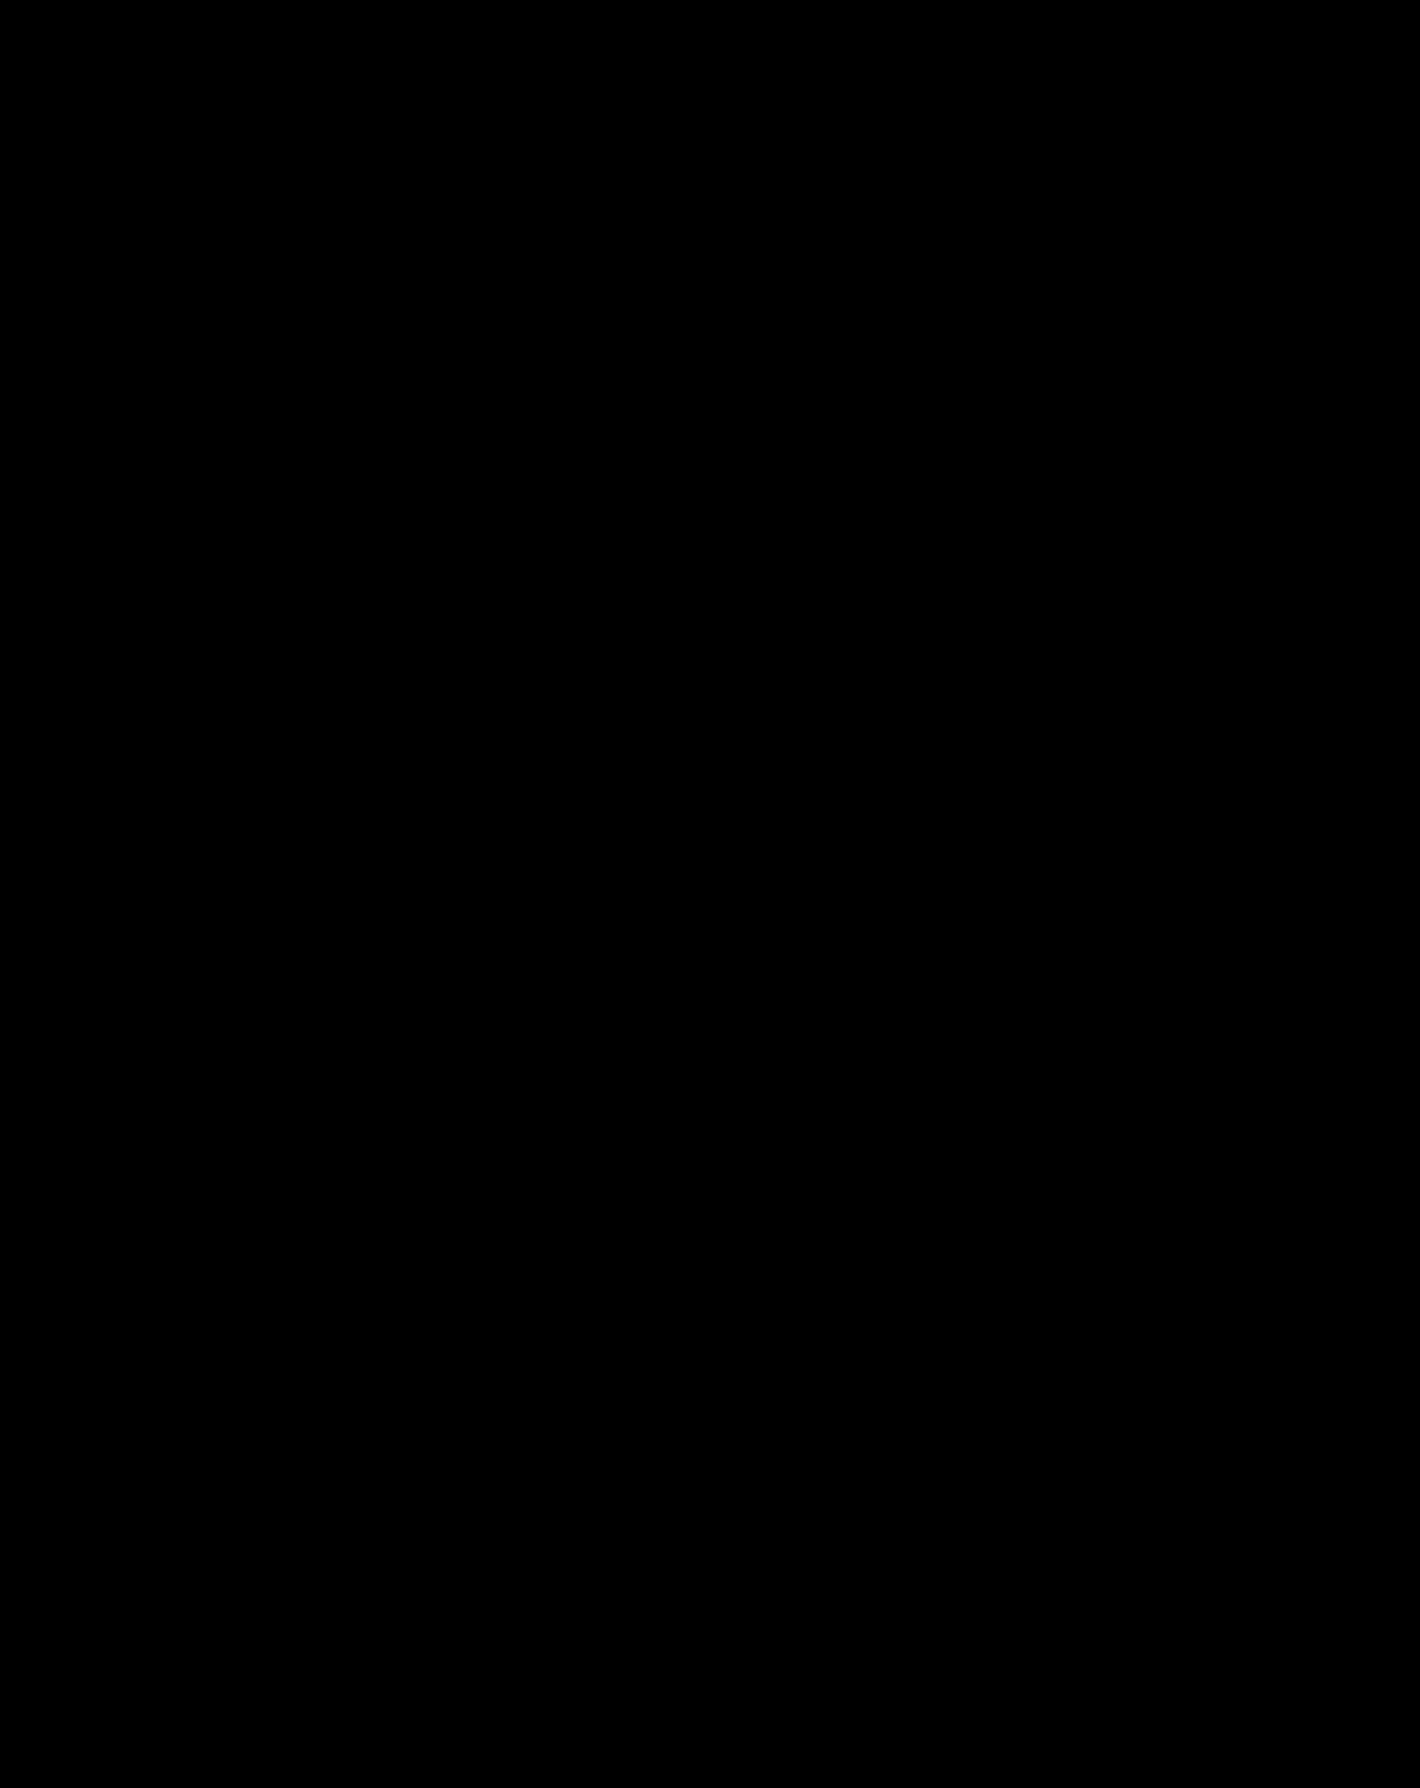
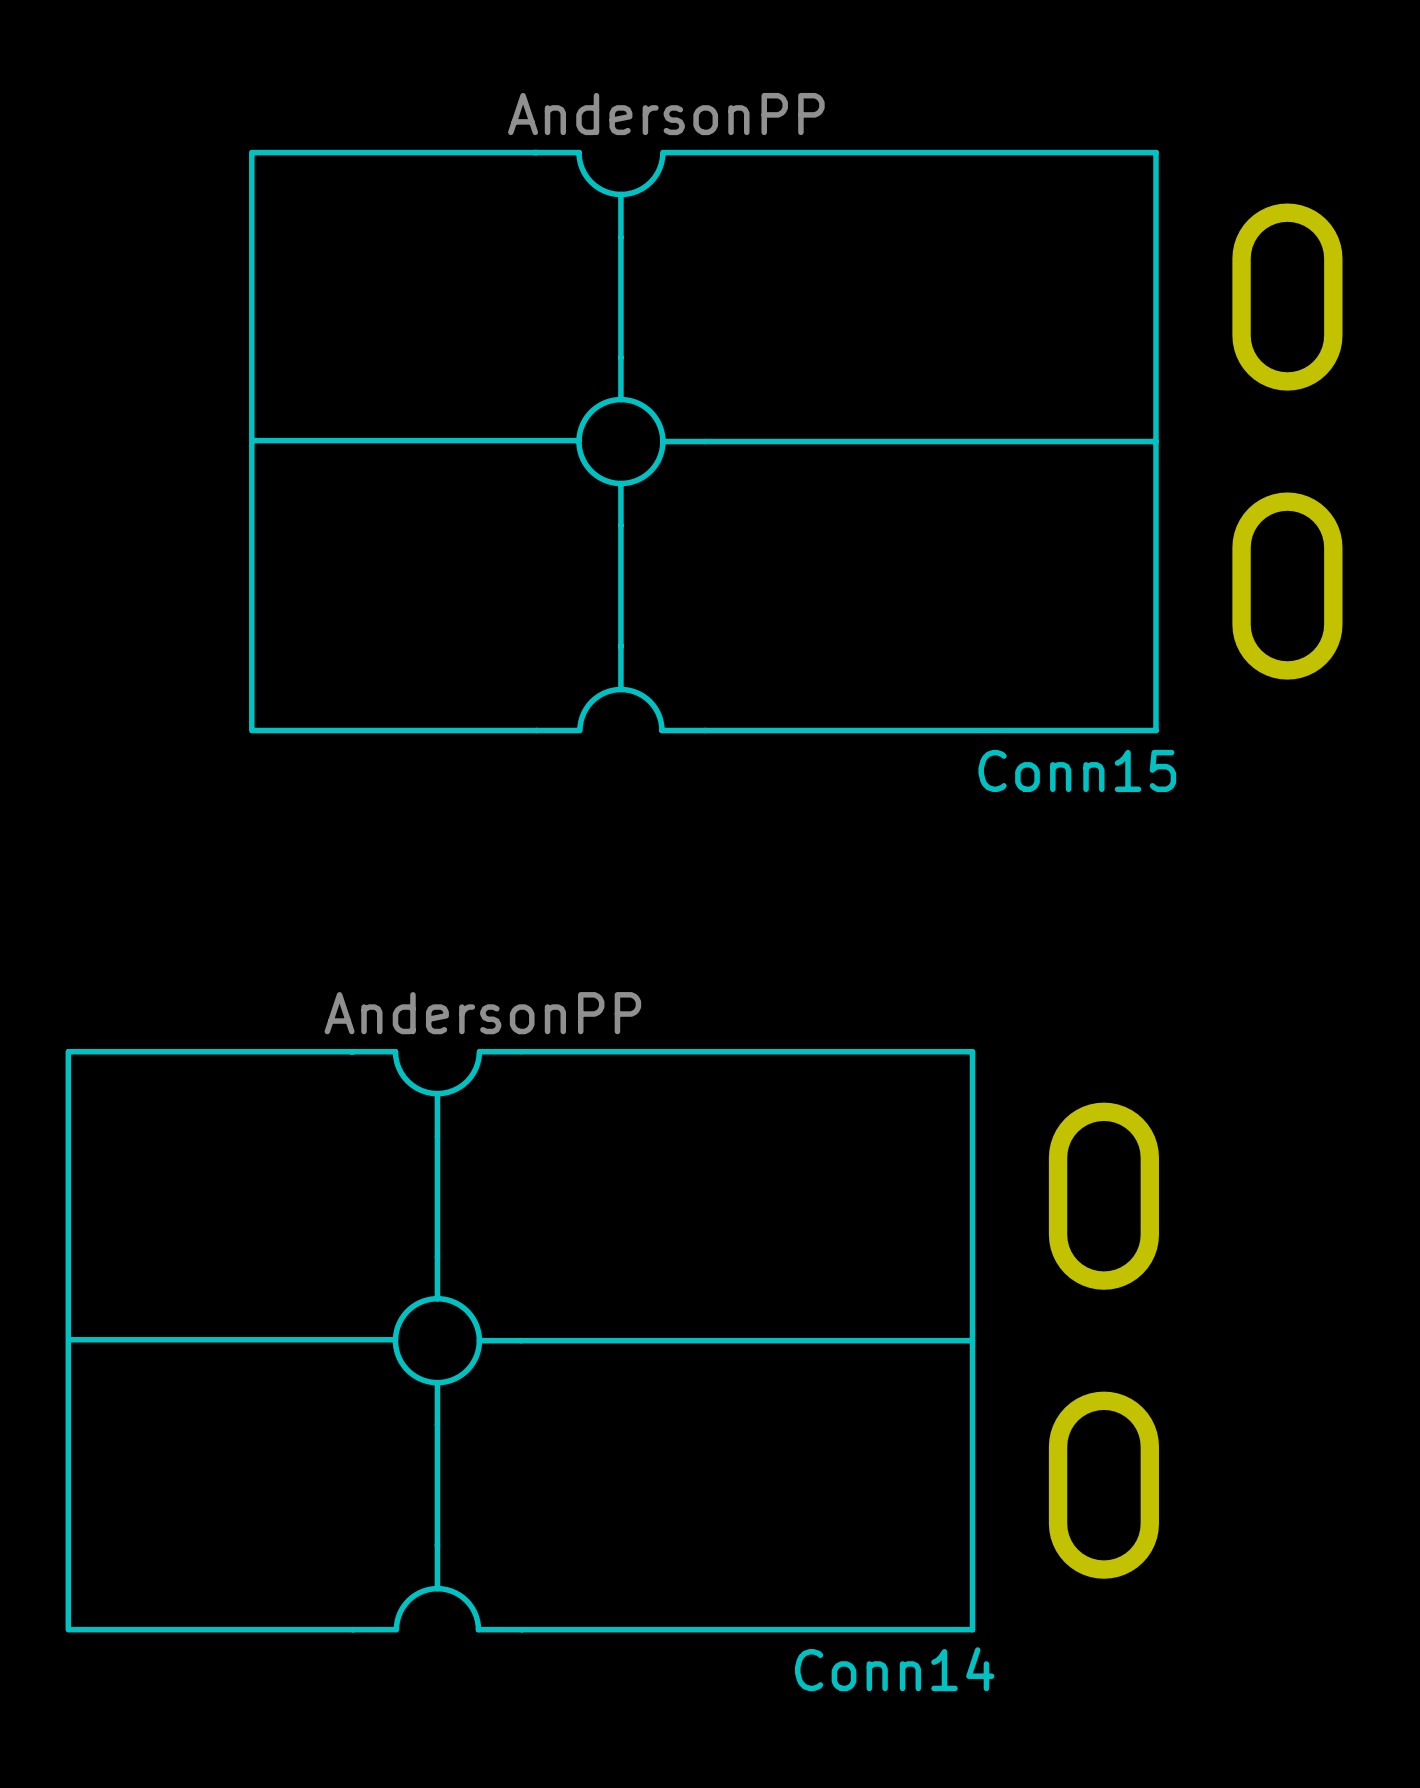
Conn15: none -> AndersonPP (795, 441)
Conn14: none -> AndersonPP (612, 1340)

